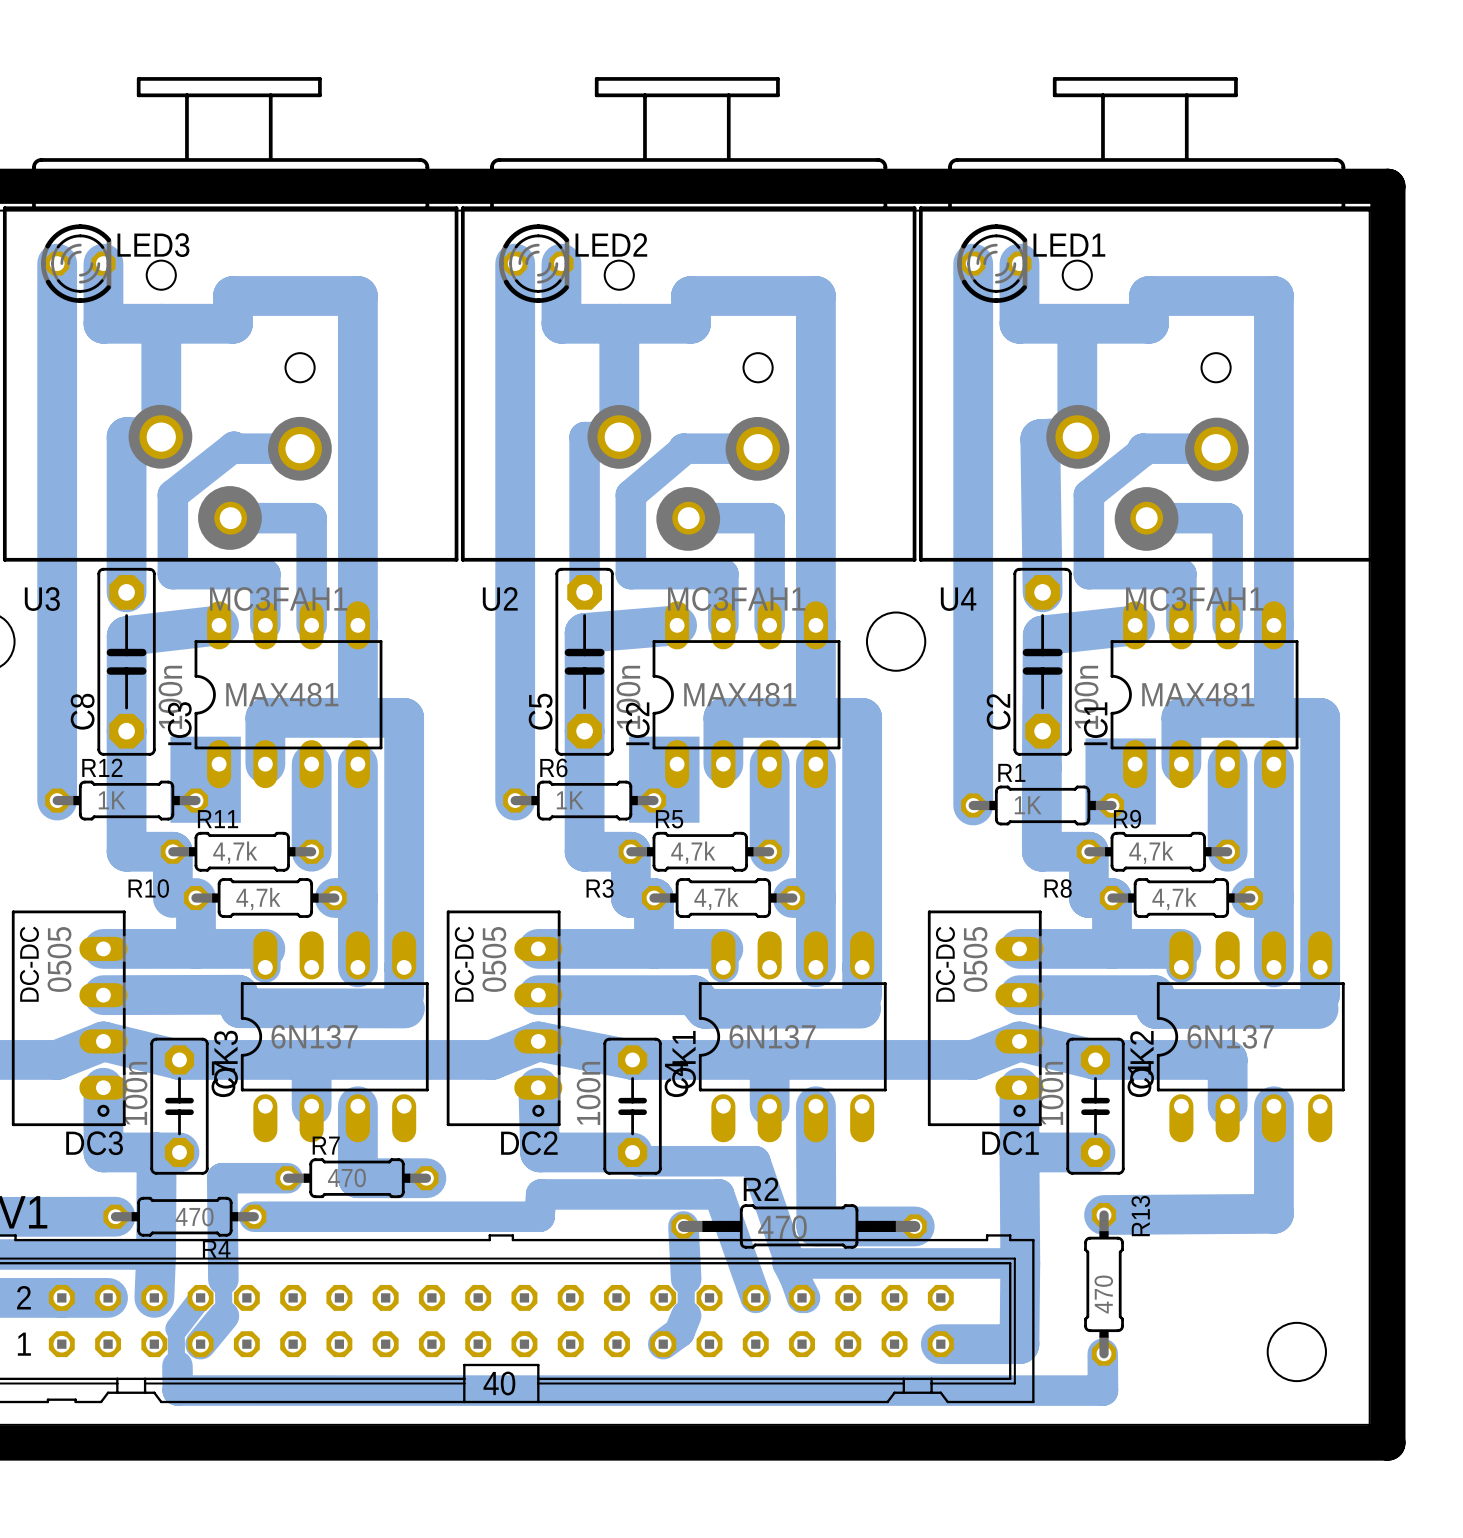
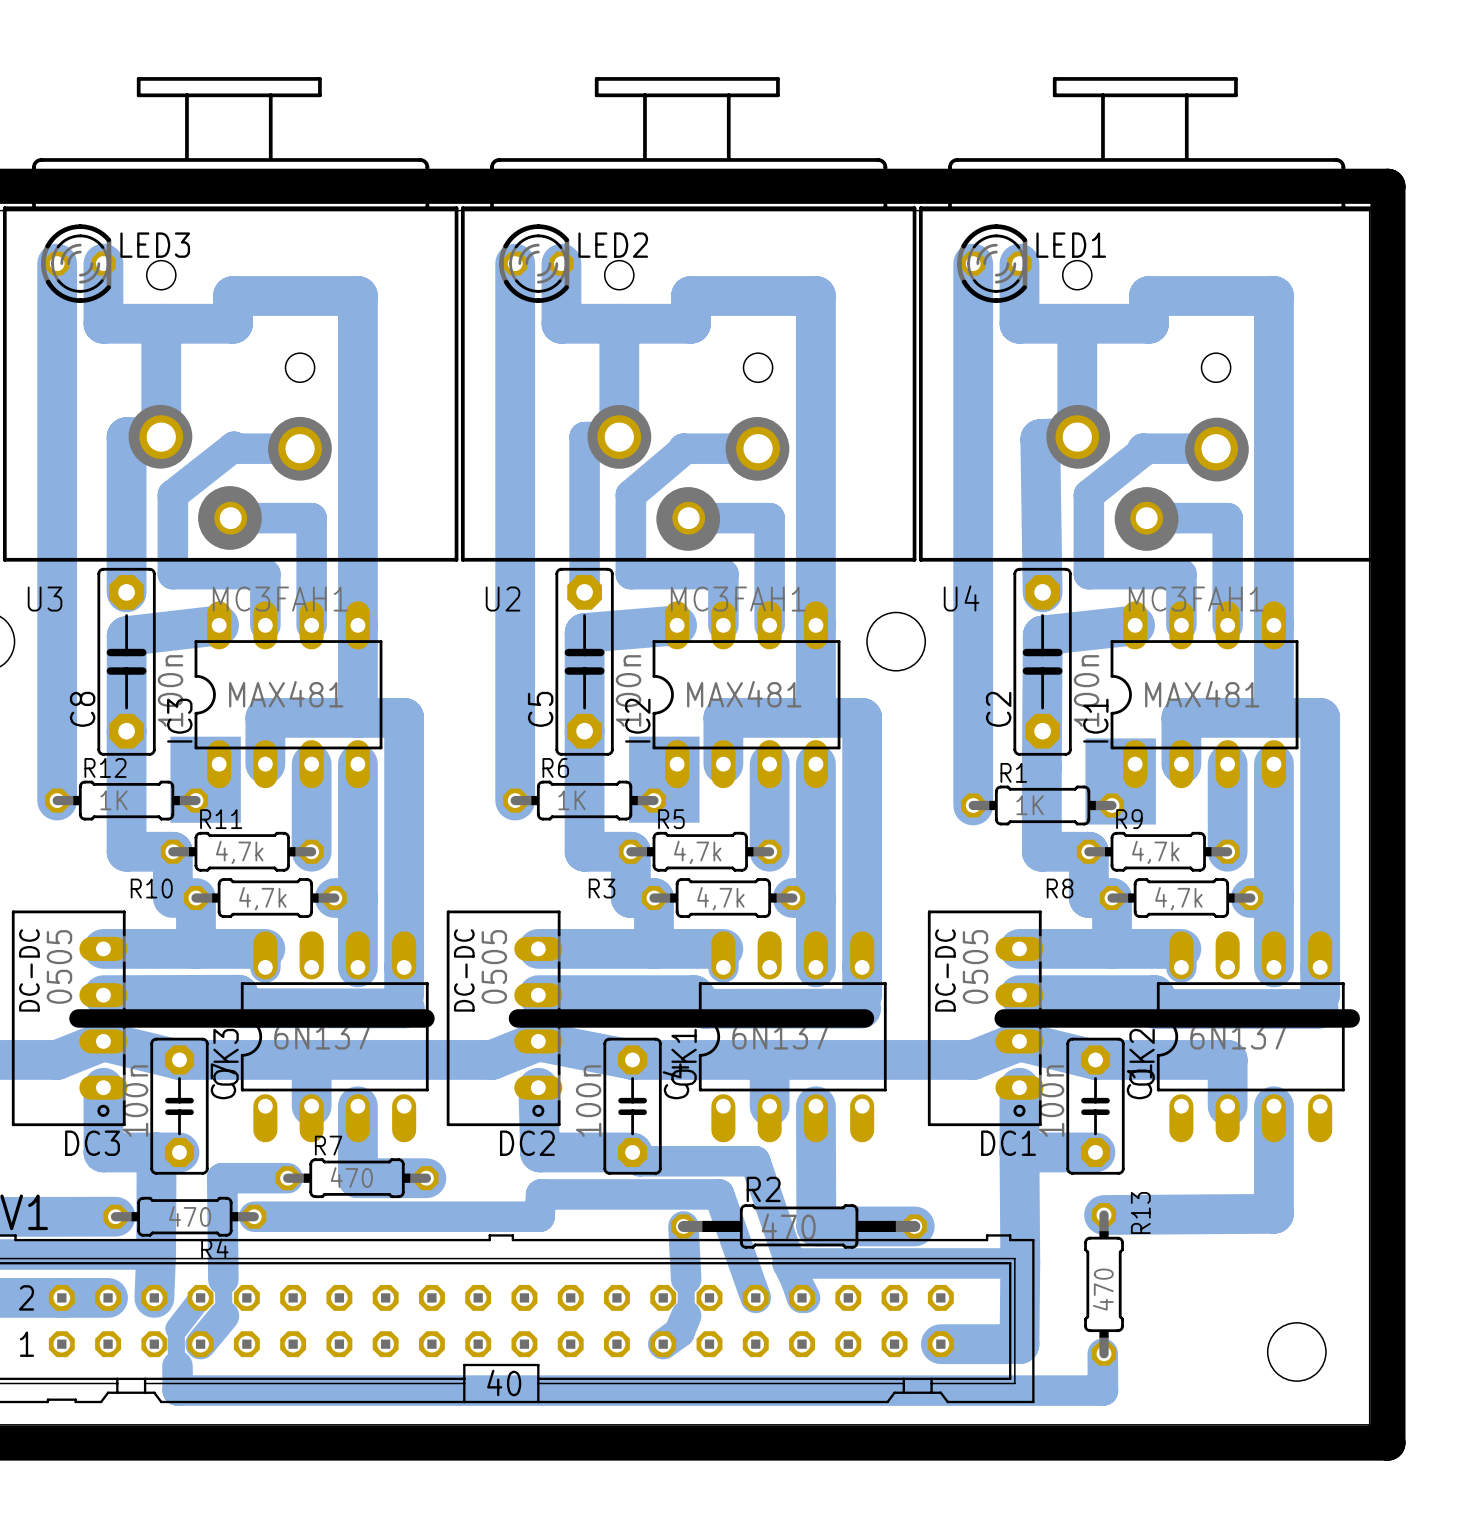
board edge: none -> (78, 1018) (425, 1018)
board edge: none -> (517, 1018) (864, 1018)
board edge: none -> (1003, 1018) (1350, 1018)

